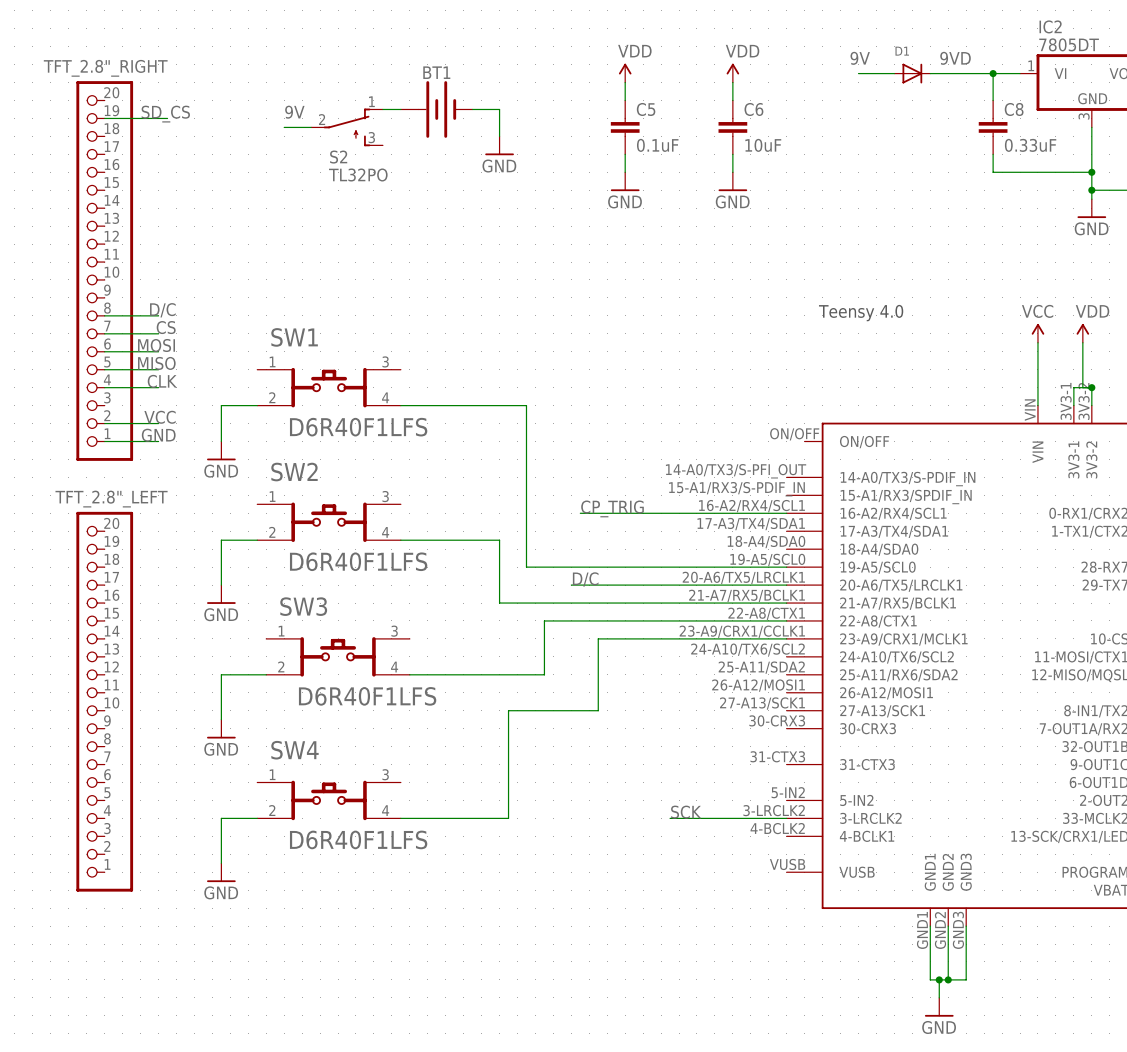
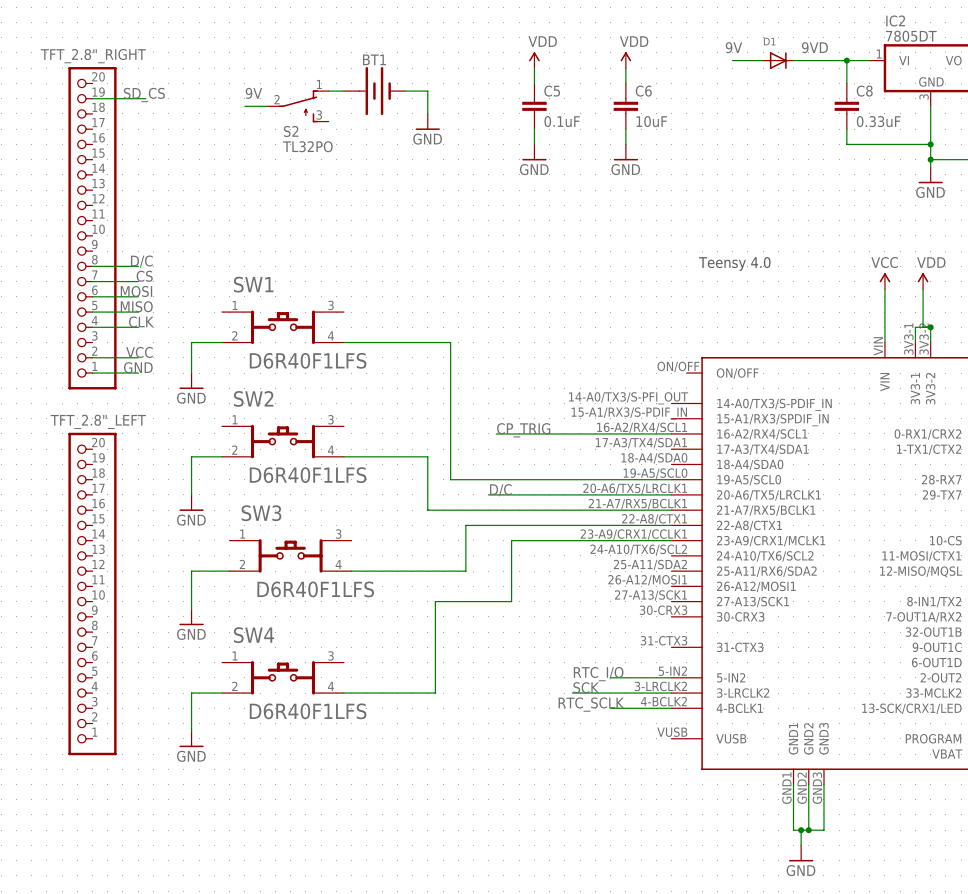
label: none -> RTC_I/O (598, 674)
wire: none -> (610, 677) (671, 677)
label: none -> RTC_SCLK (591, 704)
wire: none -> (610, 708) (671, 708)

